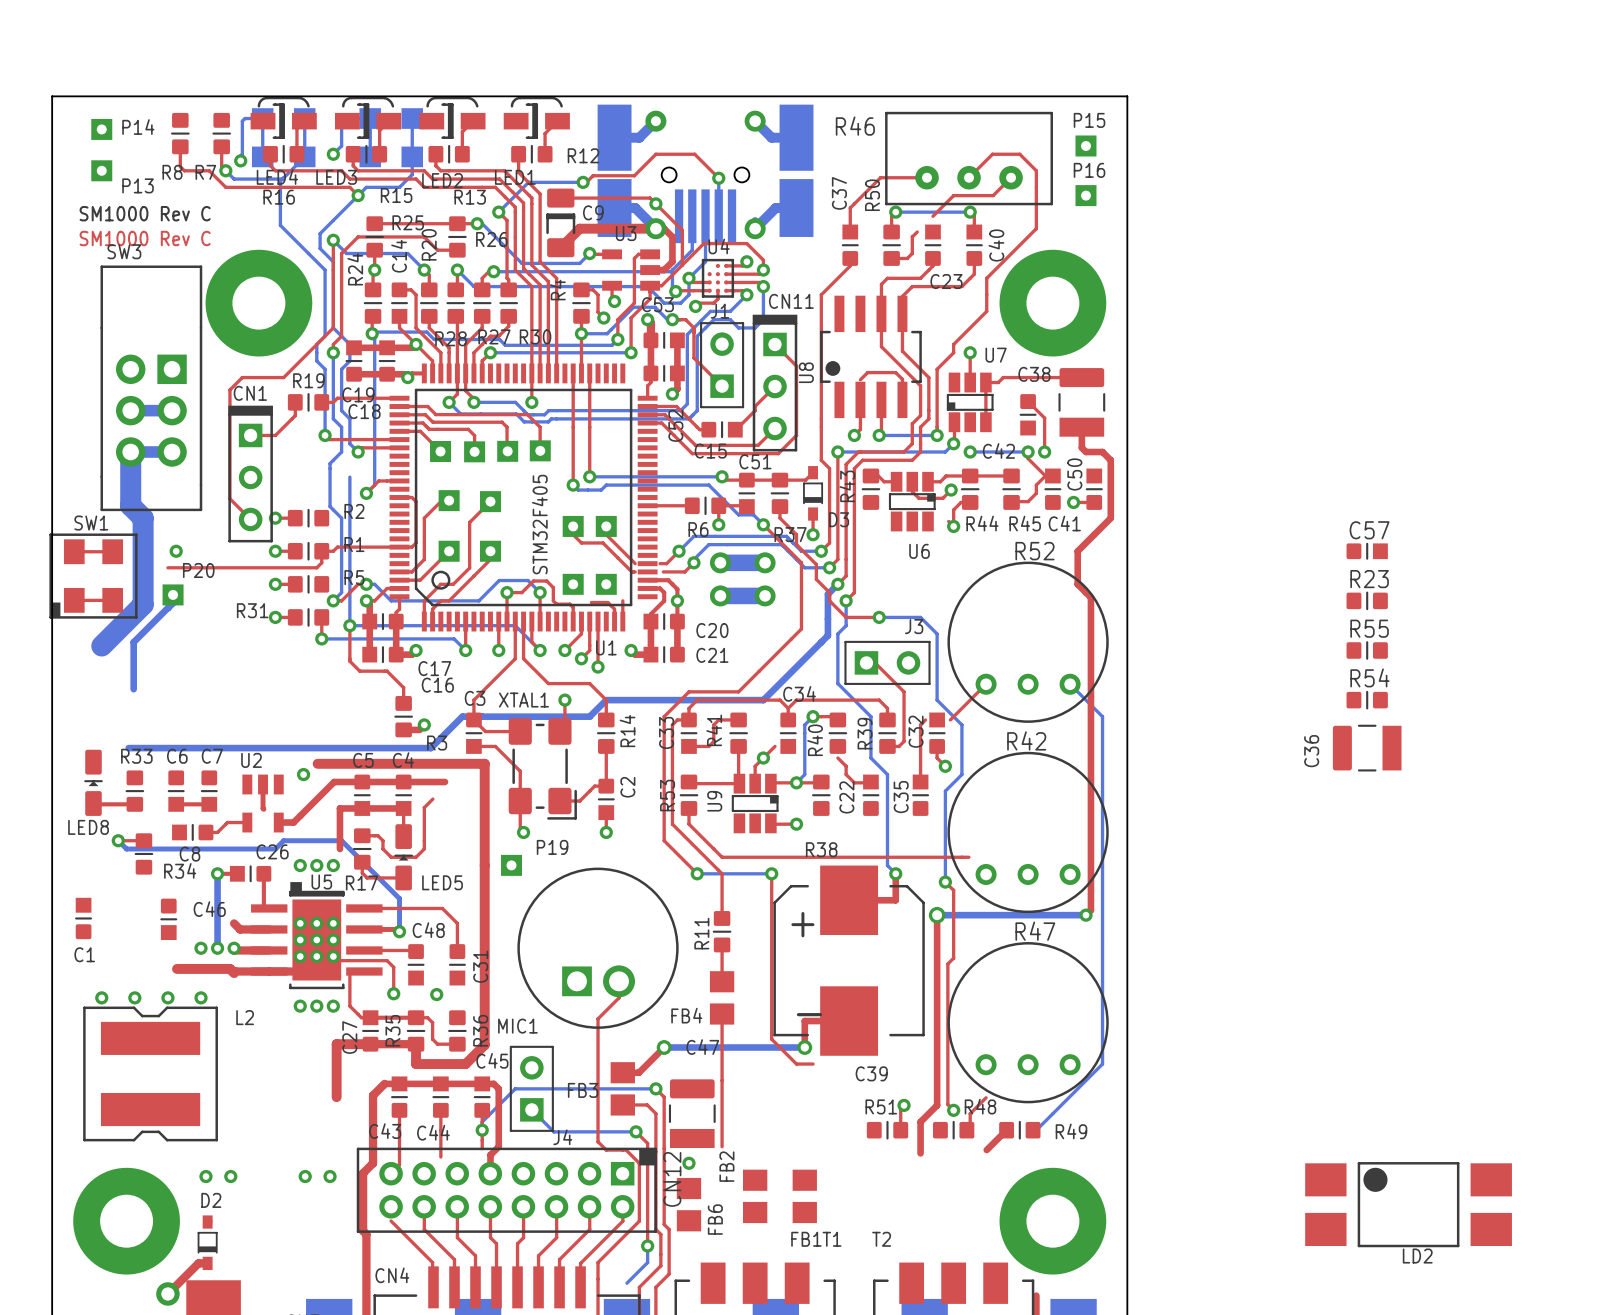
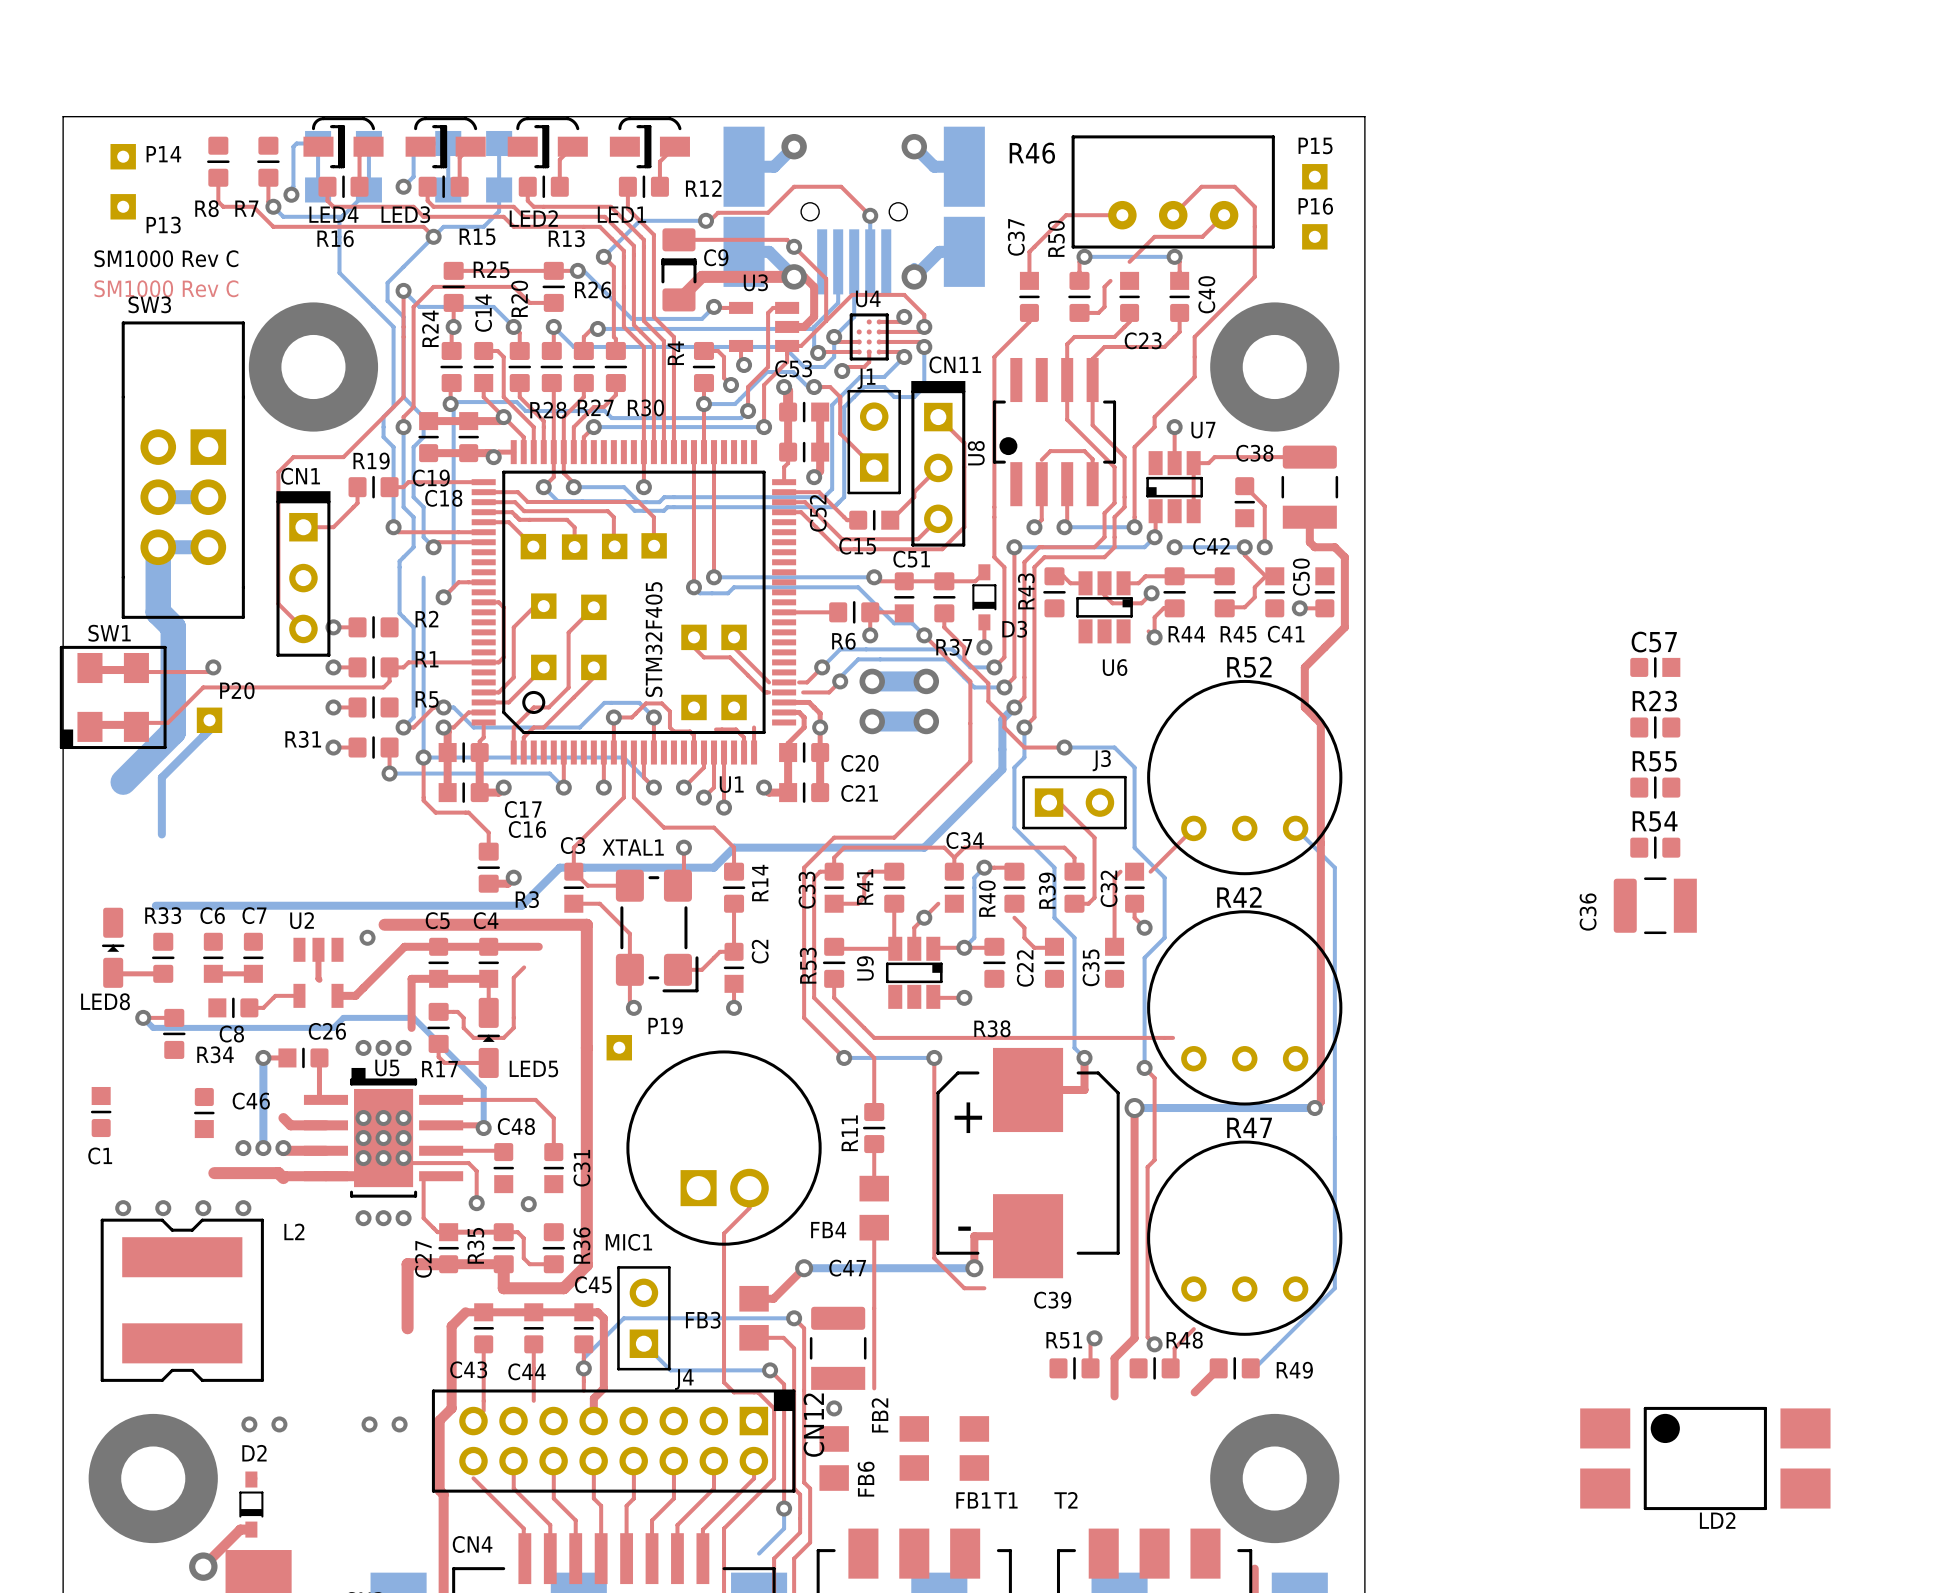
top track: none -> (213, 667) (208, 672) (89, 672)
top track: none -> (203, 687) (167, 722) (89, 722)

